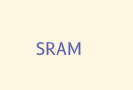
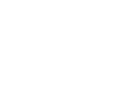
text: SRAM (58, 48) -> none

